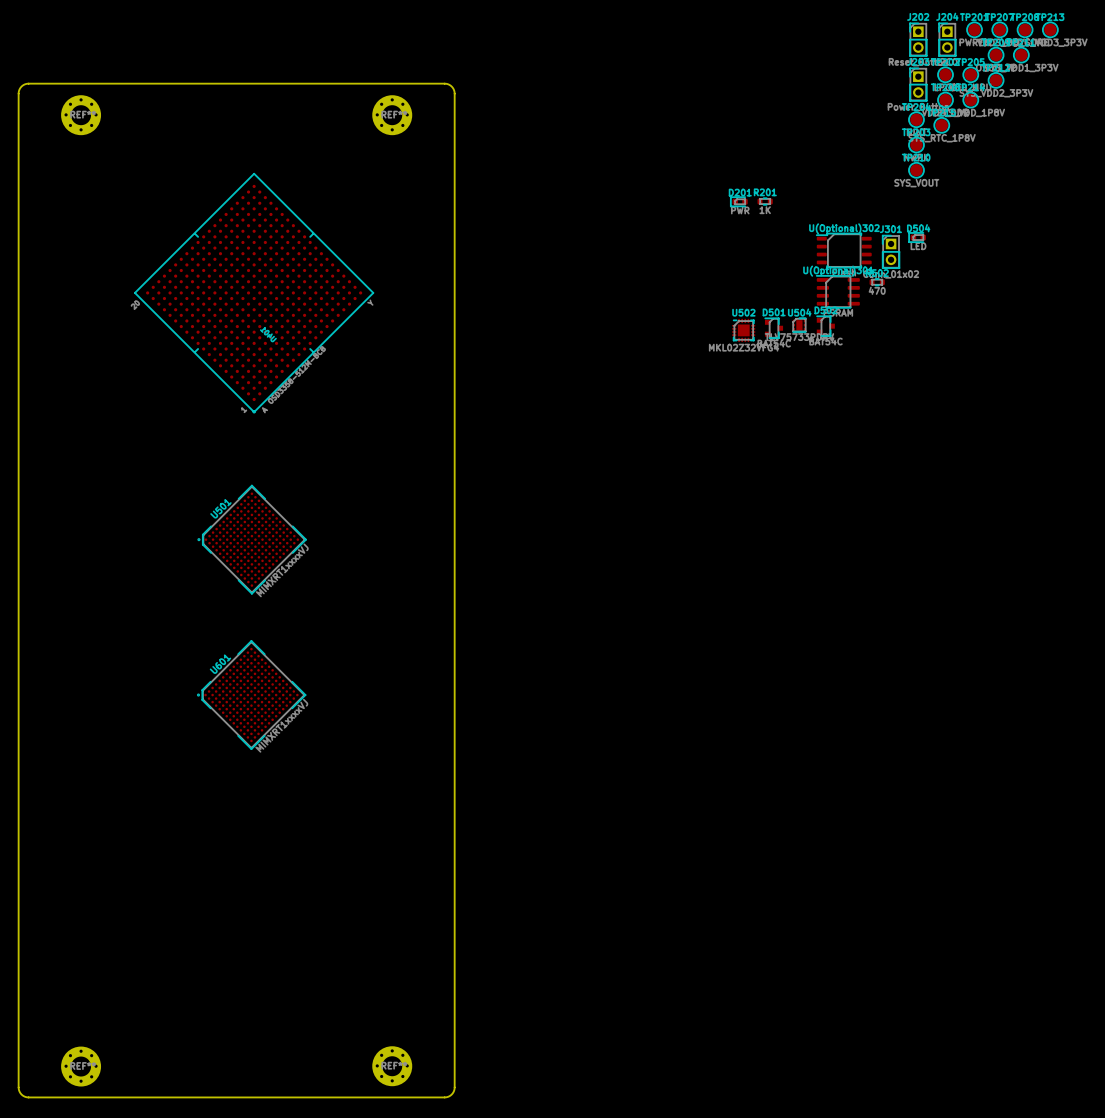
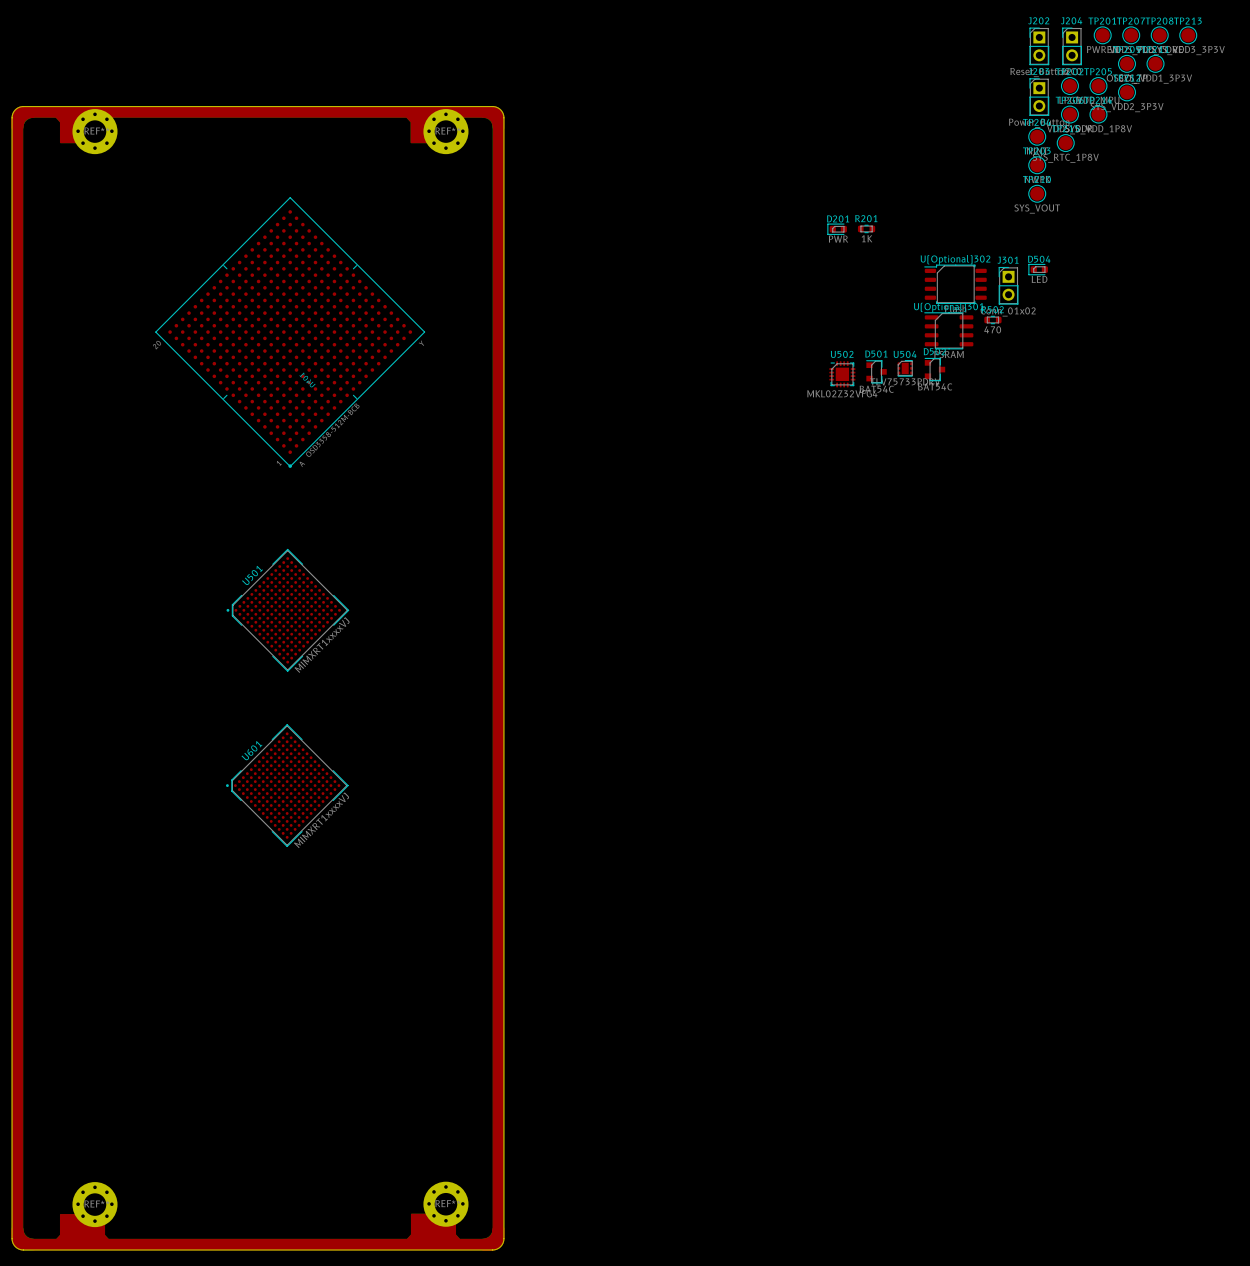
board edge: (28, 83) (444, 83) (449, 84) (453, 89) (454, 1087) (453, 1092) (448, 1096) (28, 1097) (23, 1096) (19, 1091) (18, 93) (21, 86) (28, 83) -> (23, 106) (492, 106) (498, 108) (503, 113) (503, 1238) (502, 1244) (496, 1249) (23, 1249) (17, 1248) (12, 1243) (12, 117) (15, 109) (23, 106)
drawing: none -> [11, 106, 505, 1251]

